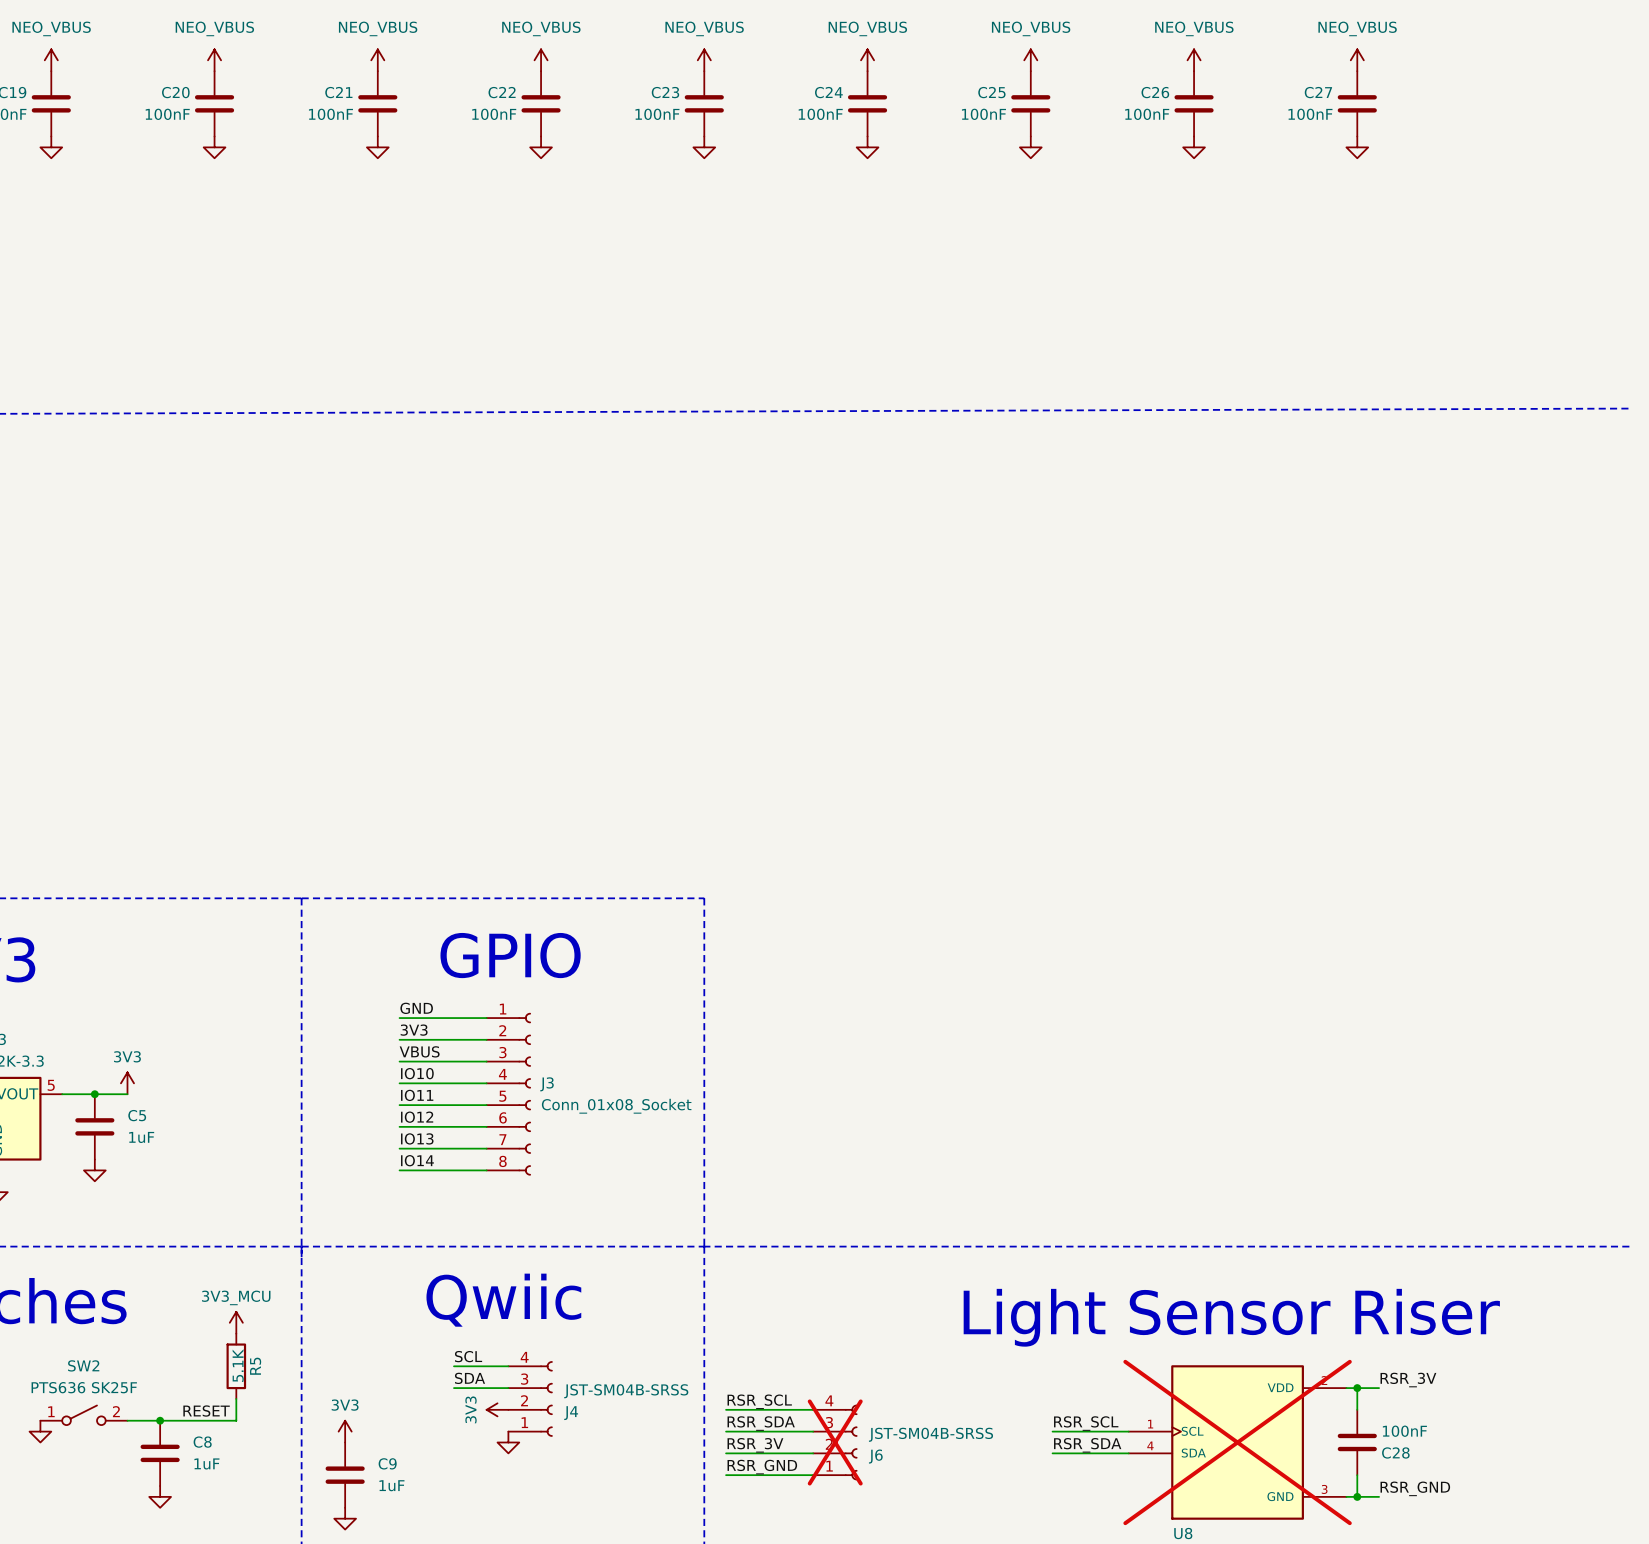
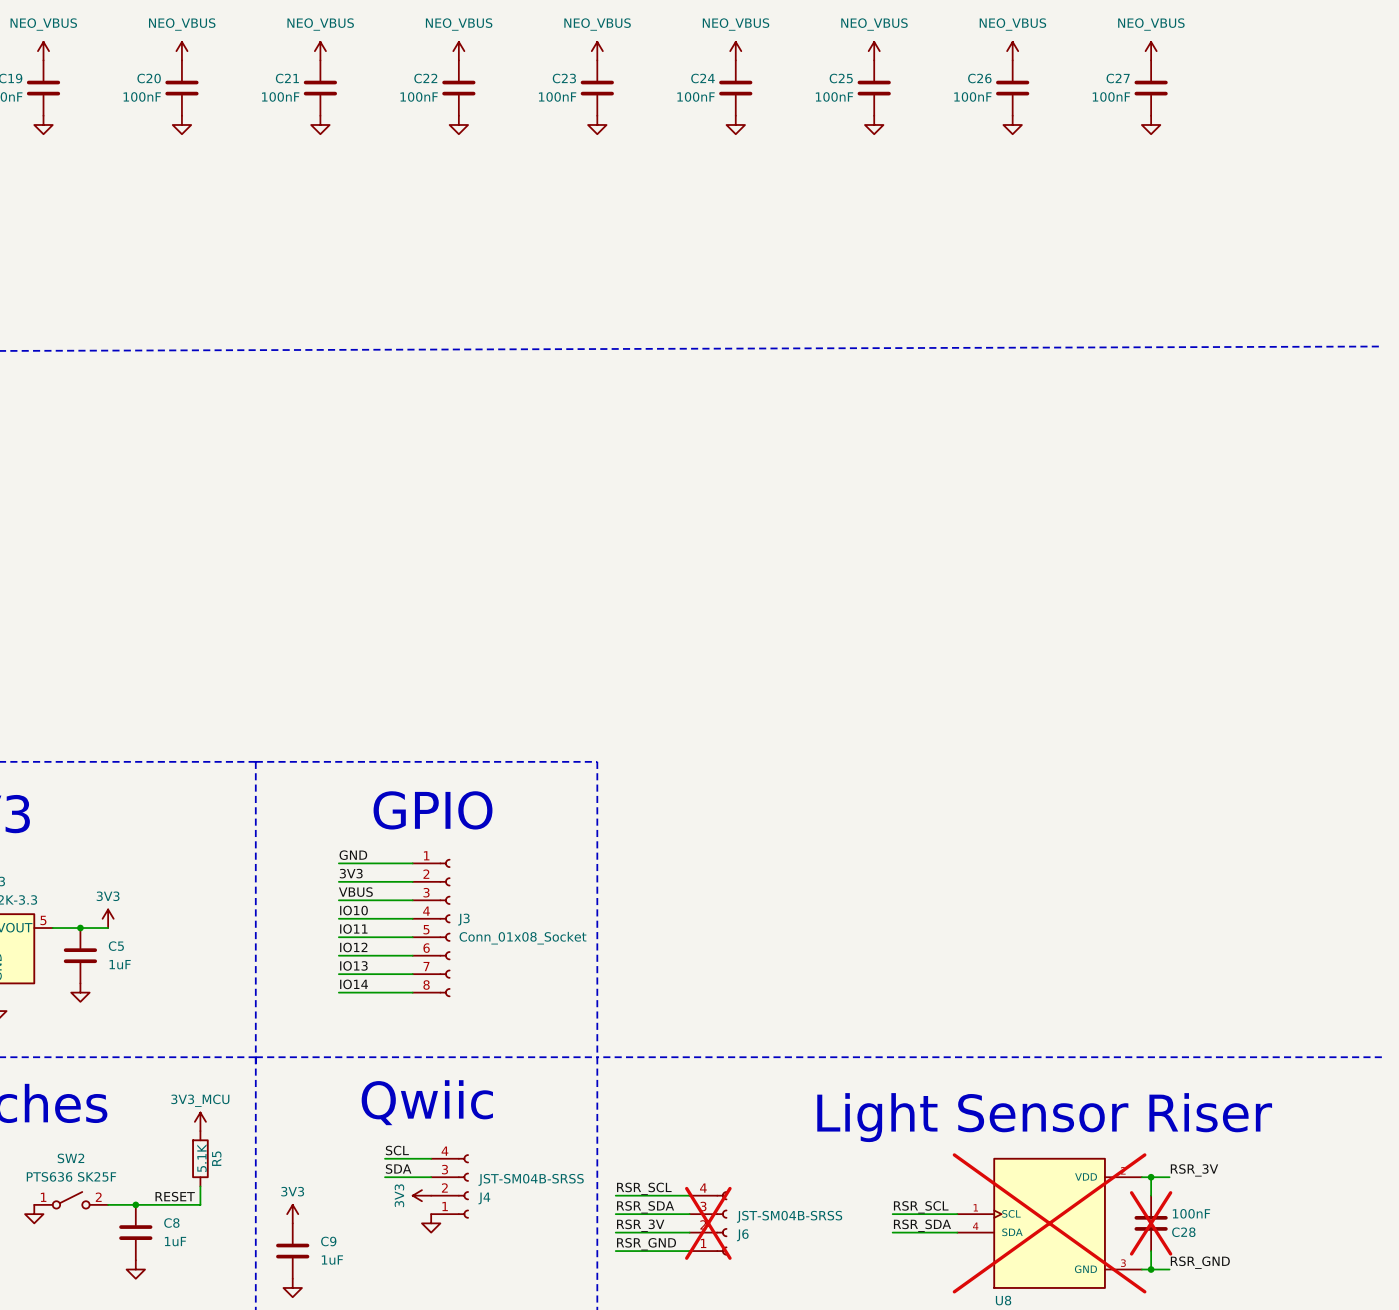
C28 do-not-place cross: none -> (1151, 1223)

